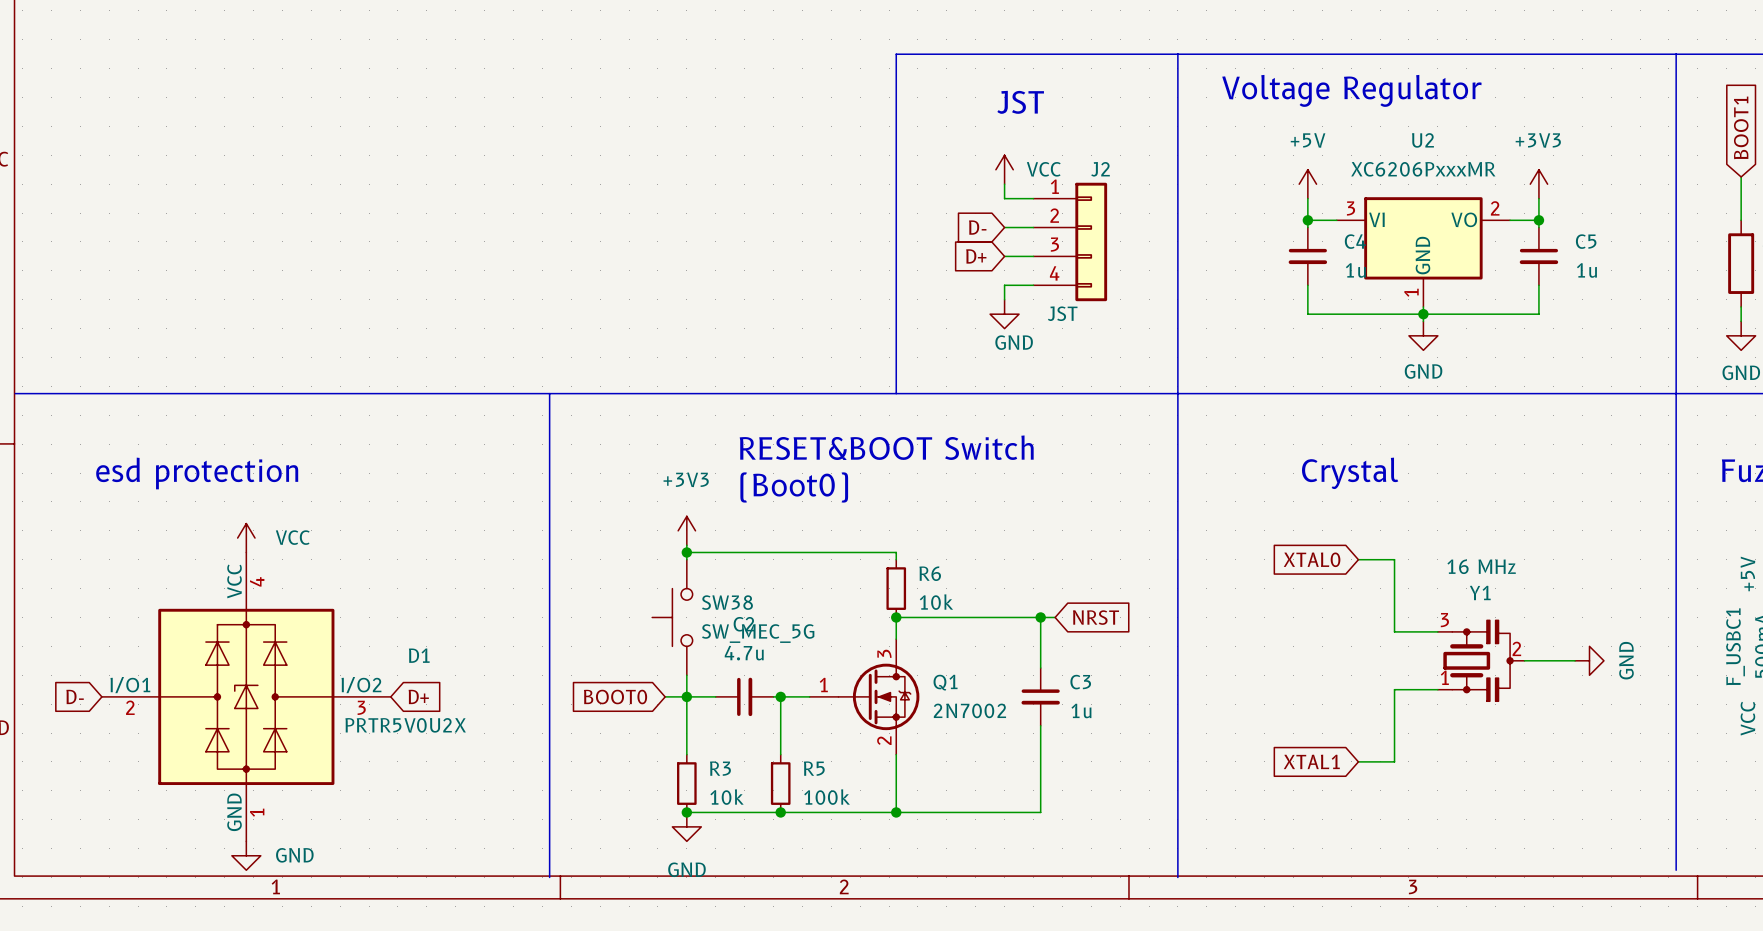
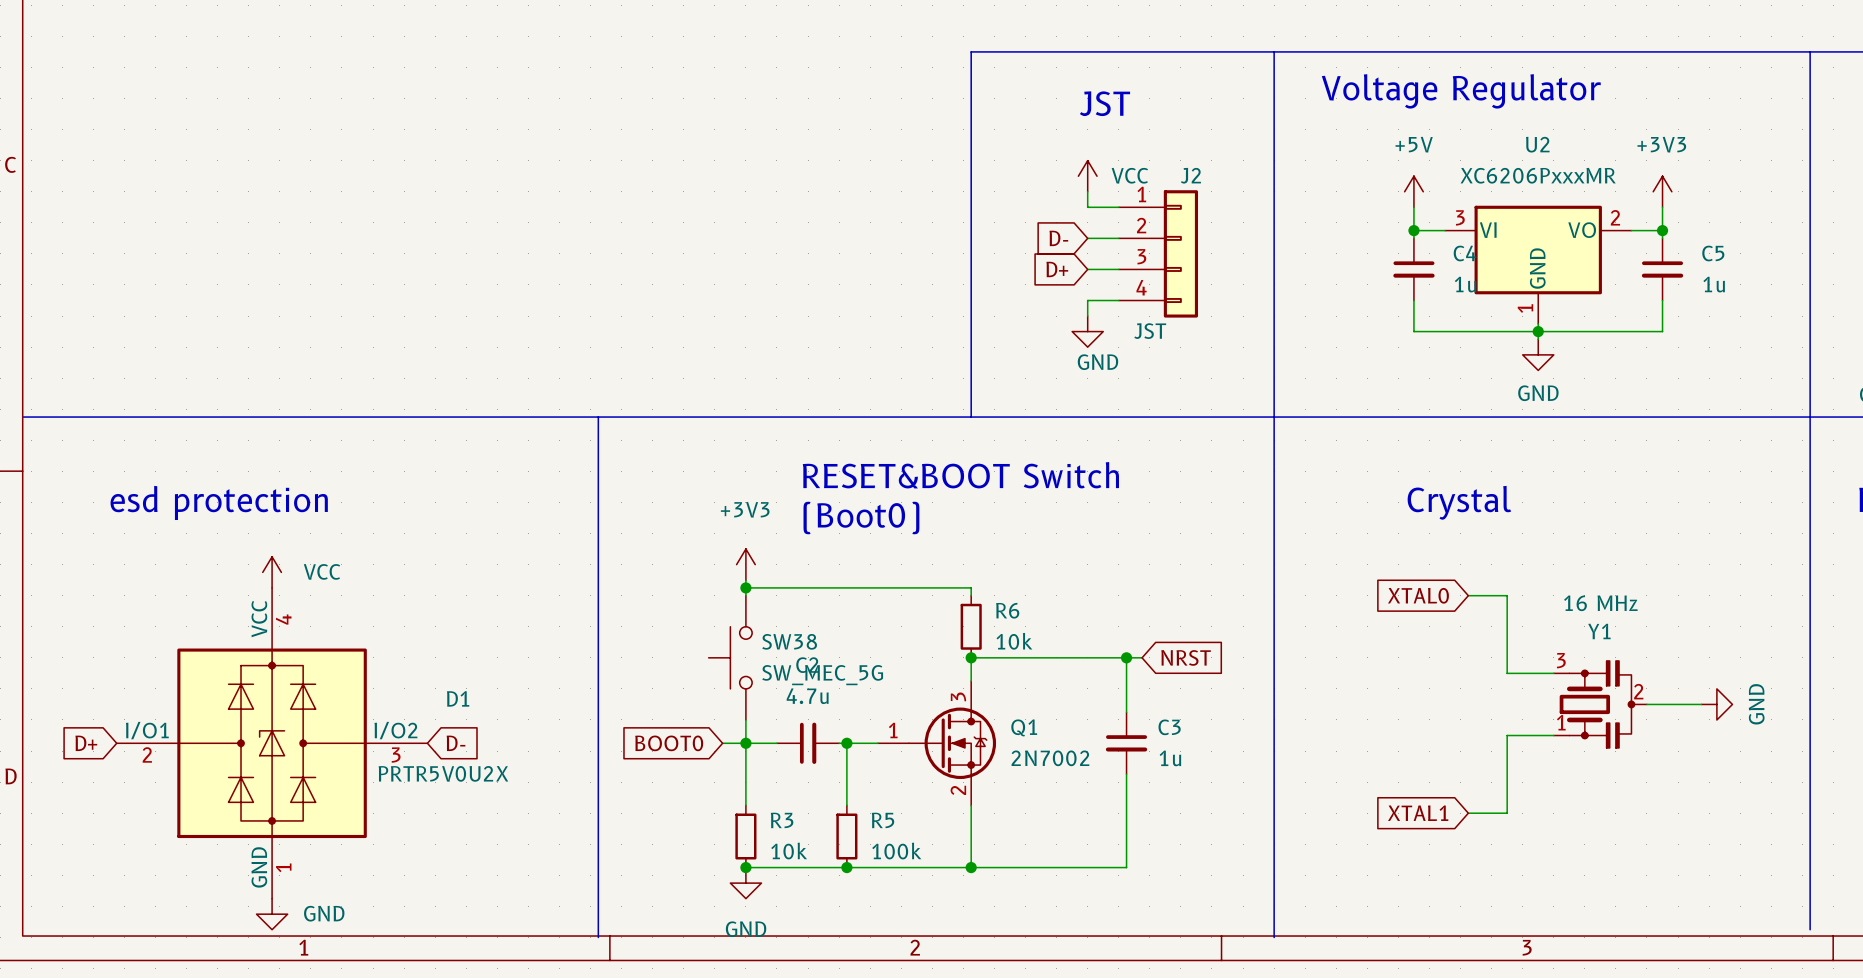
global label: D- (75, 696) -> D+ (86, 743)
global label: D+ (418, 696) -> D- (456, 743)

